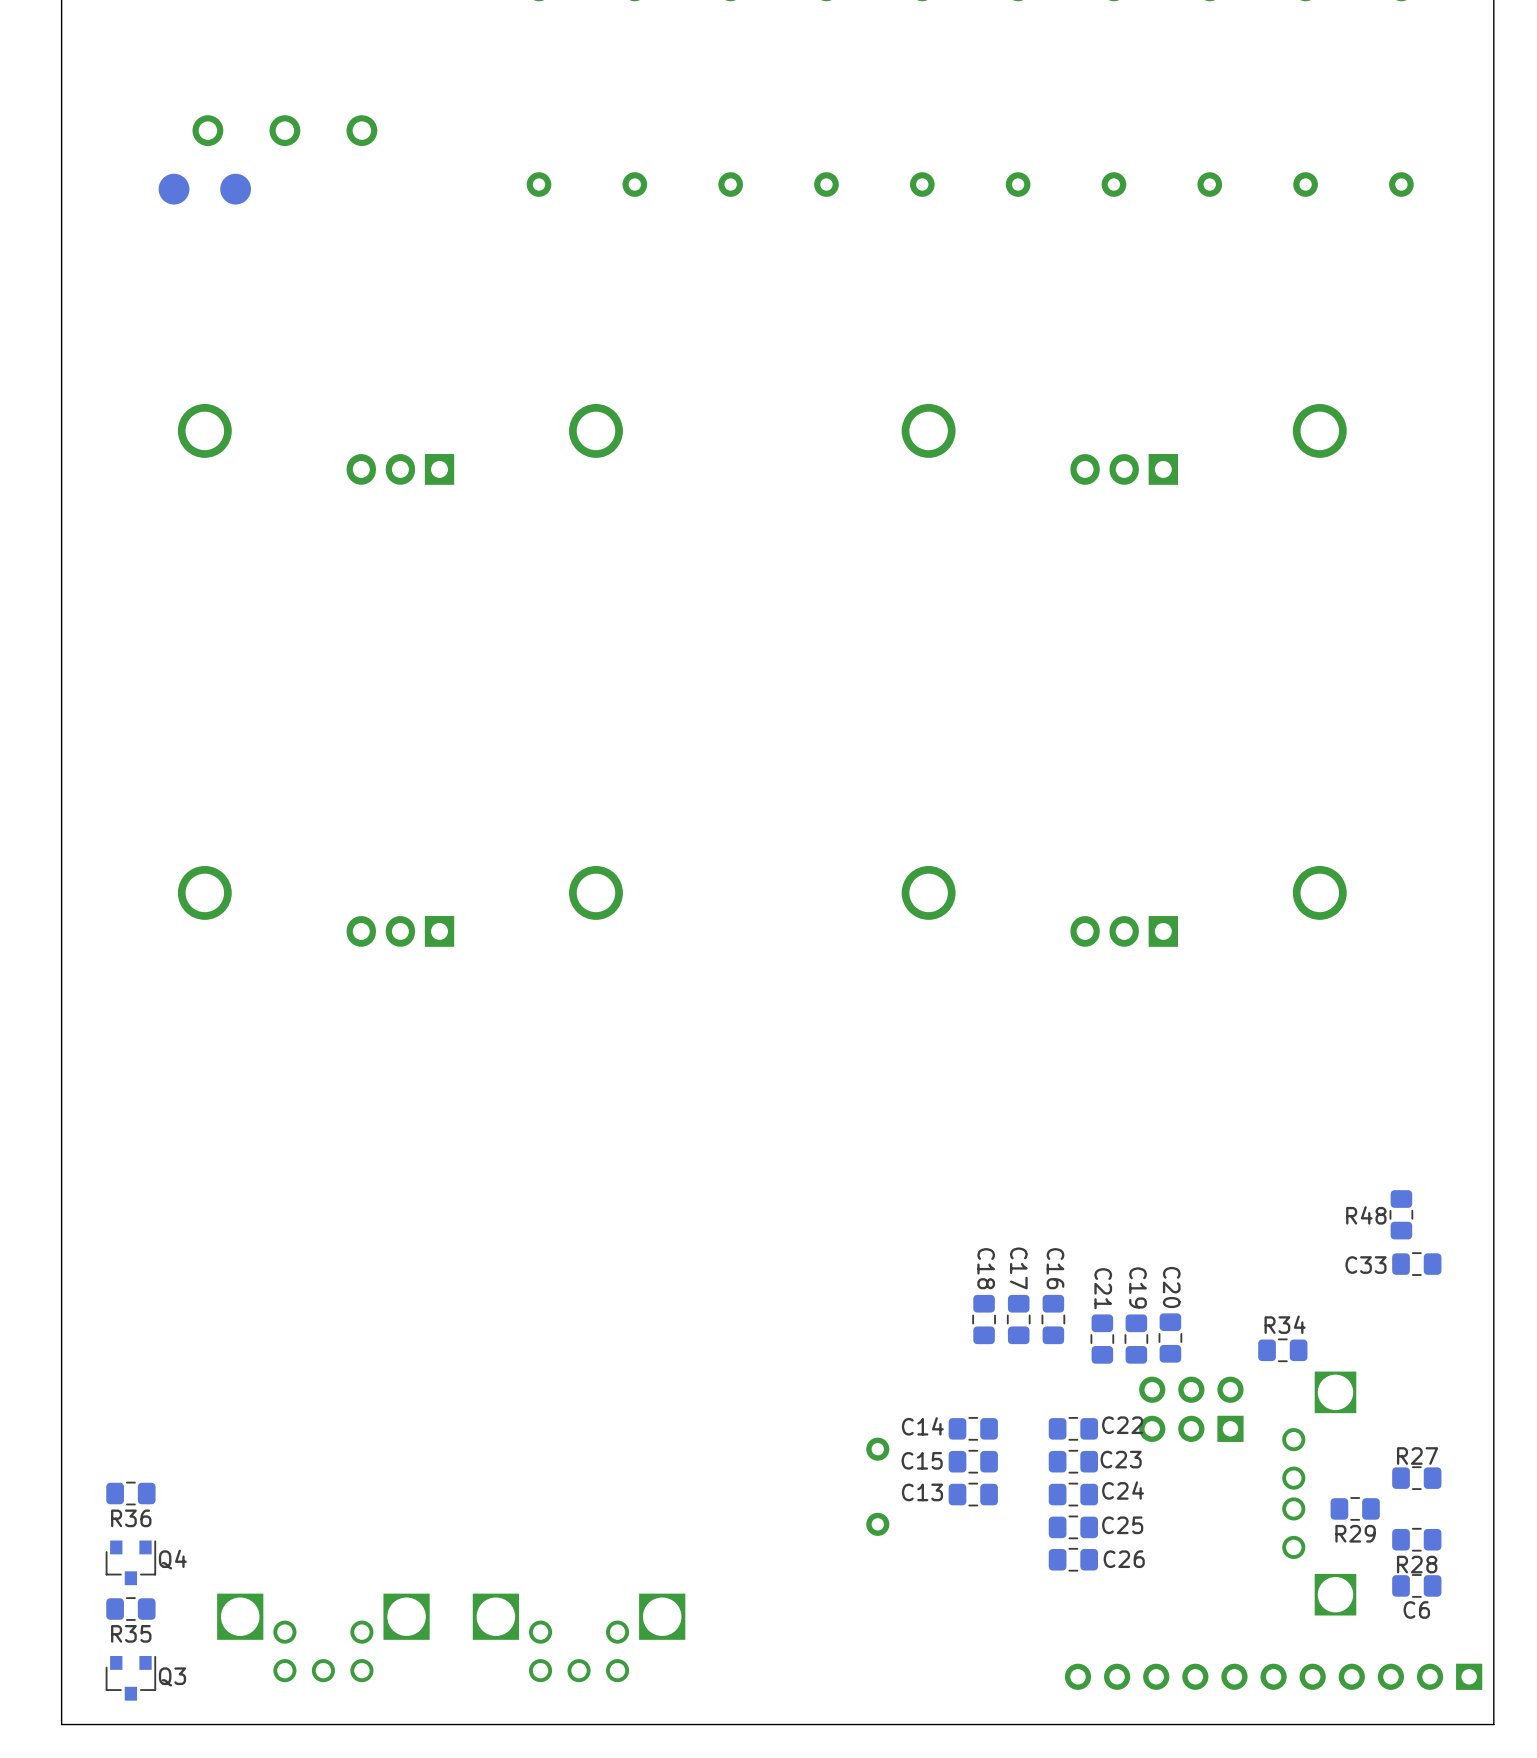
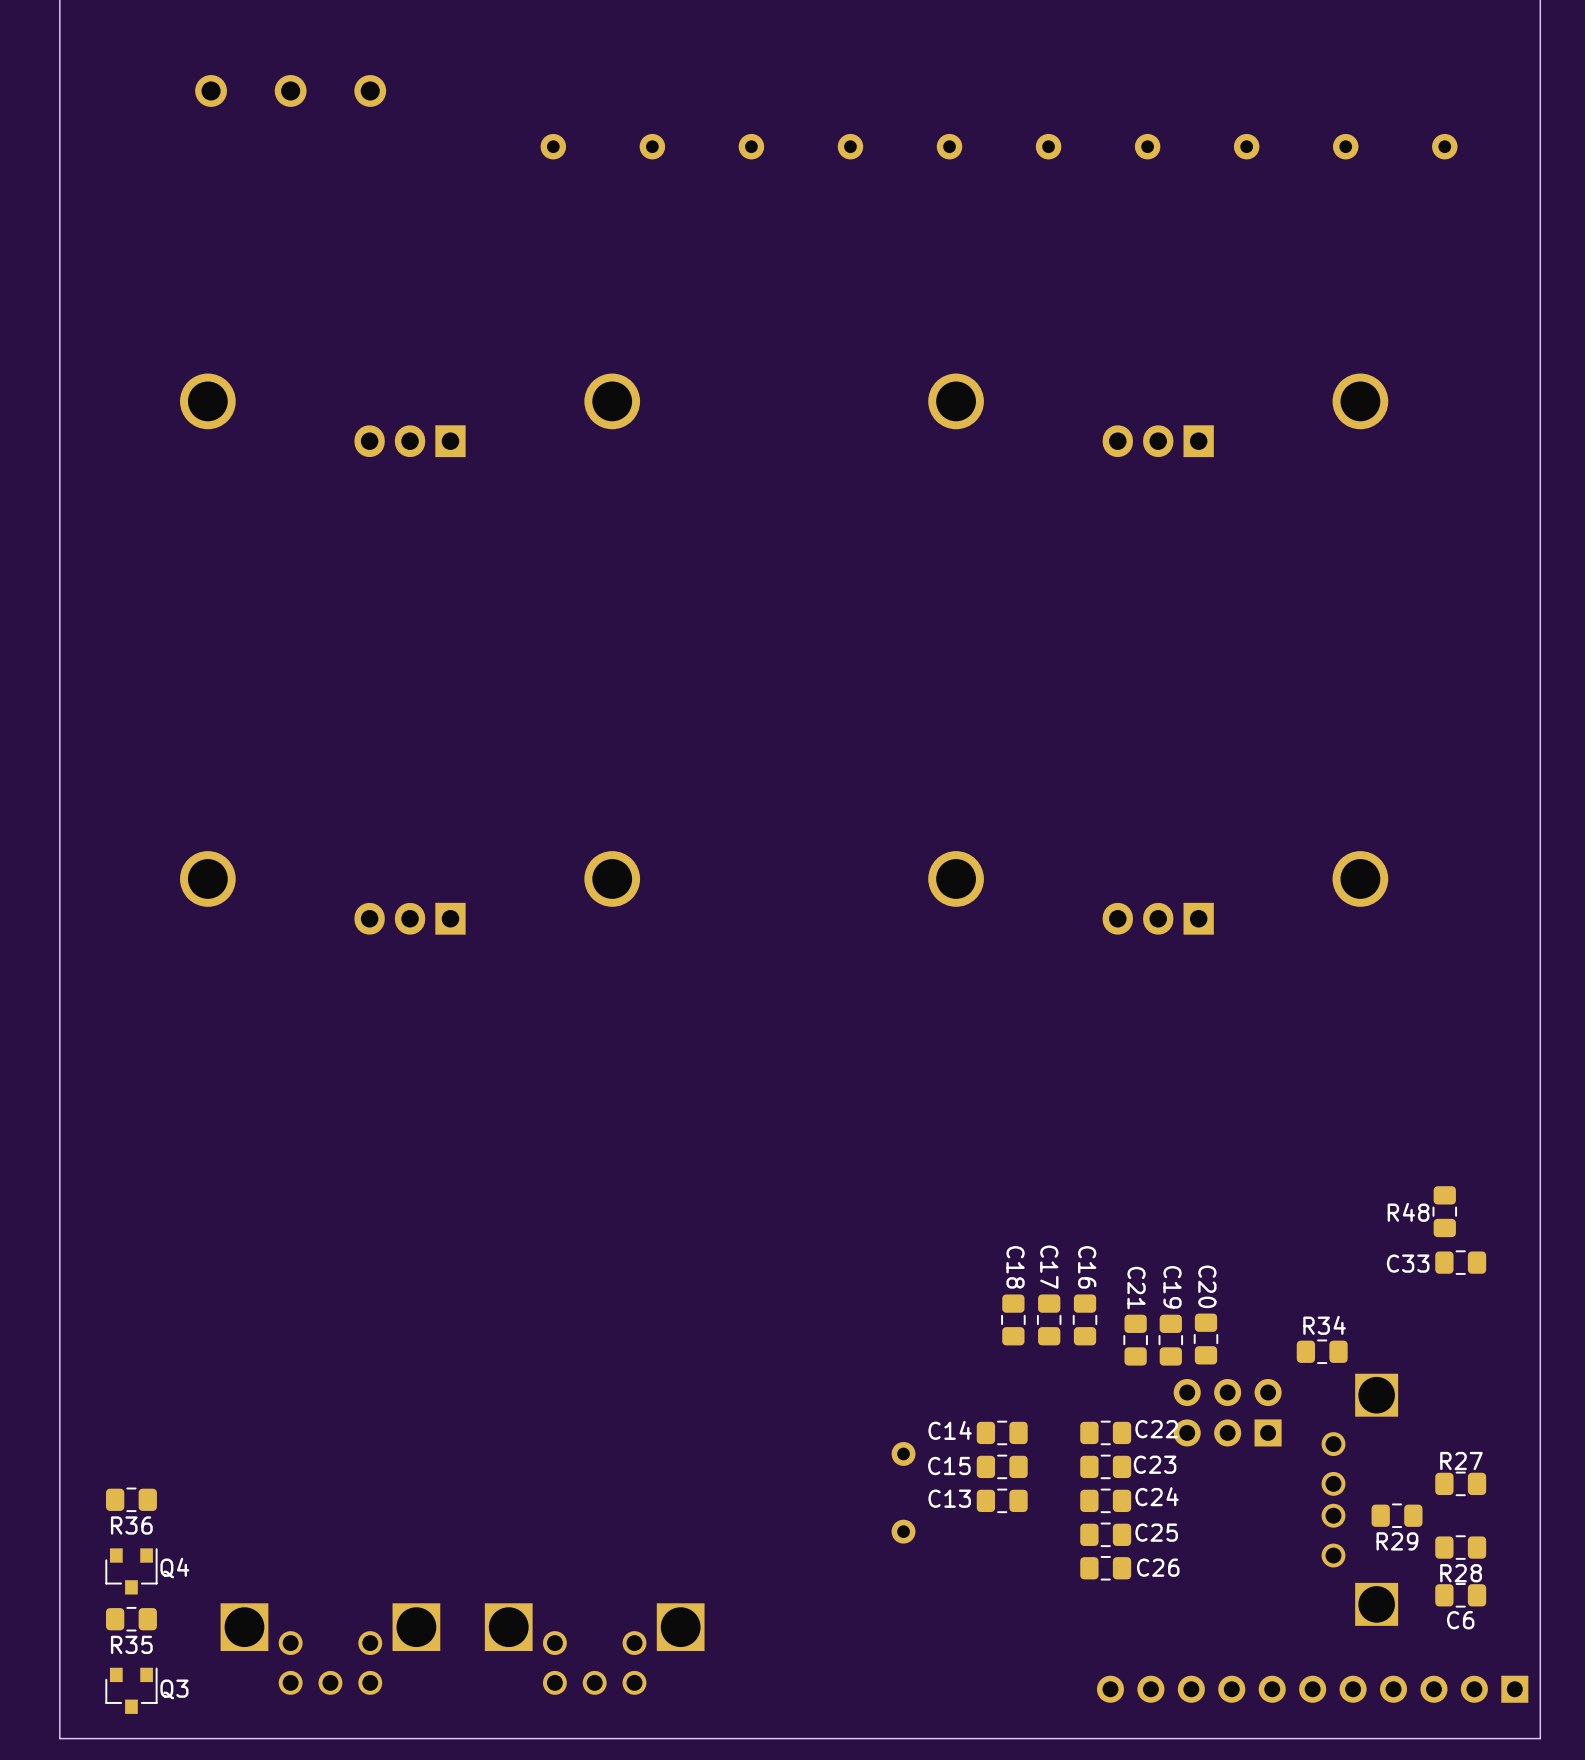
part: (204, 189) -> none

